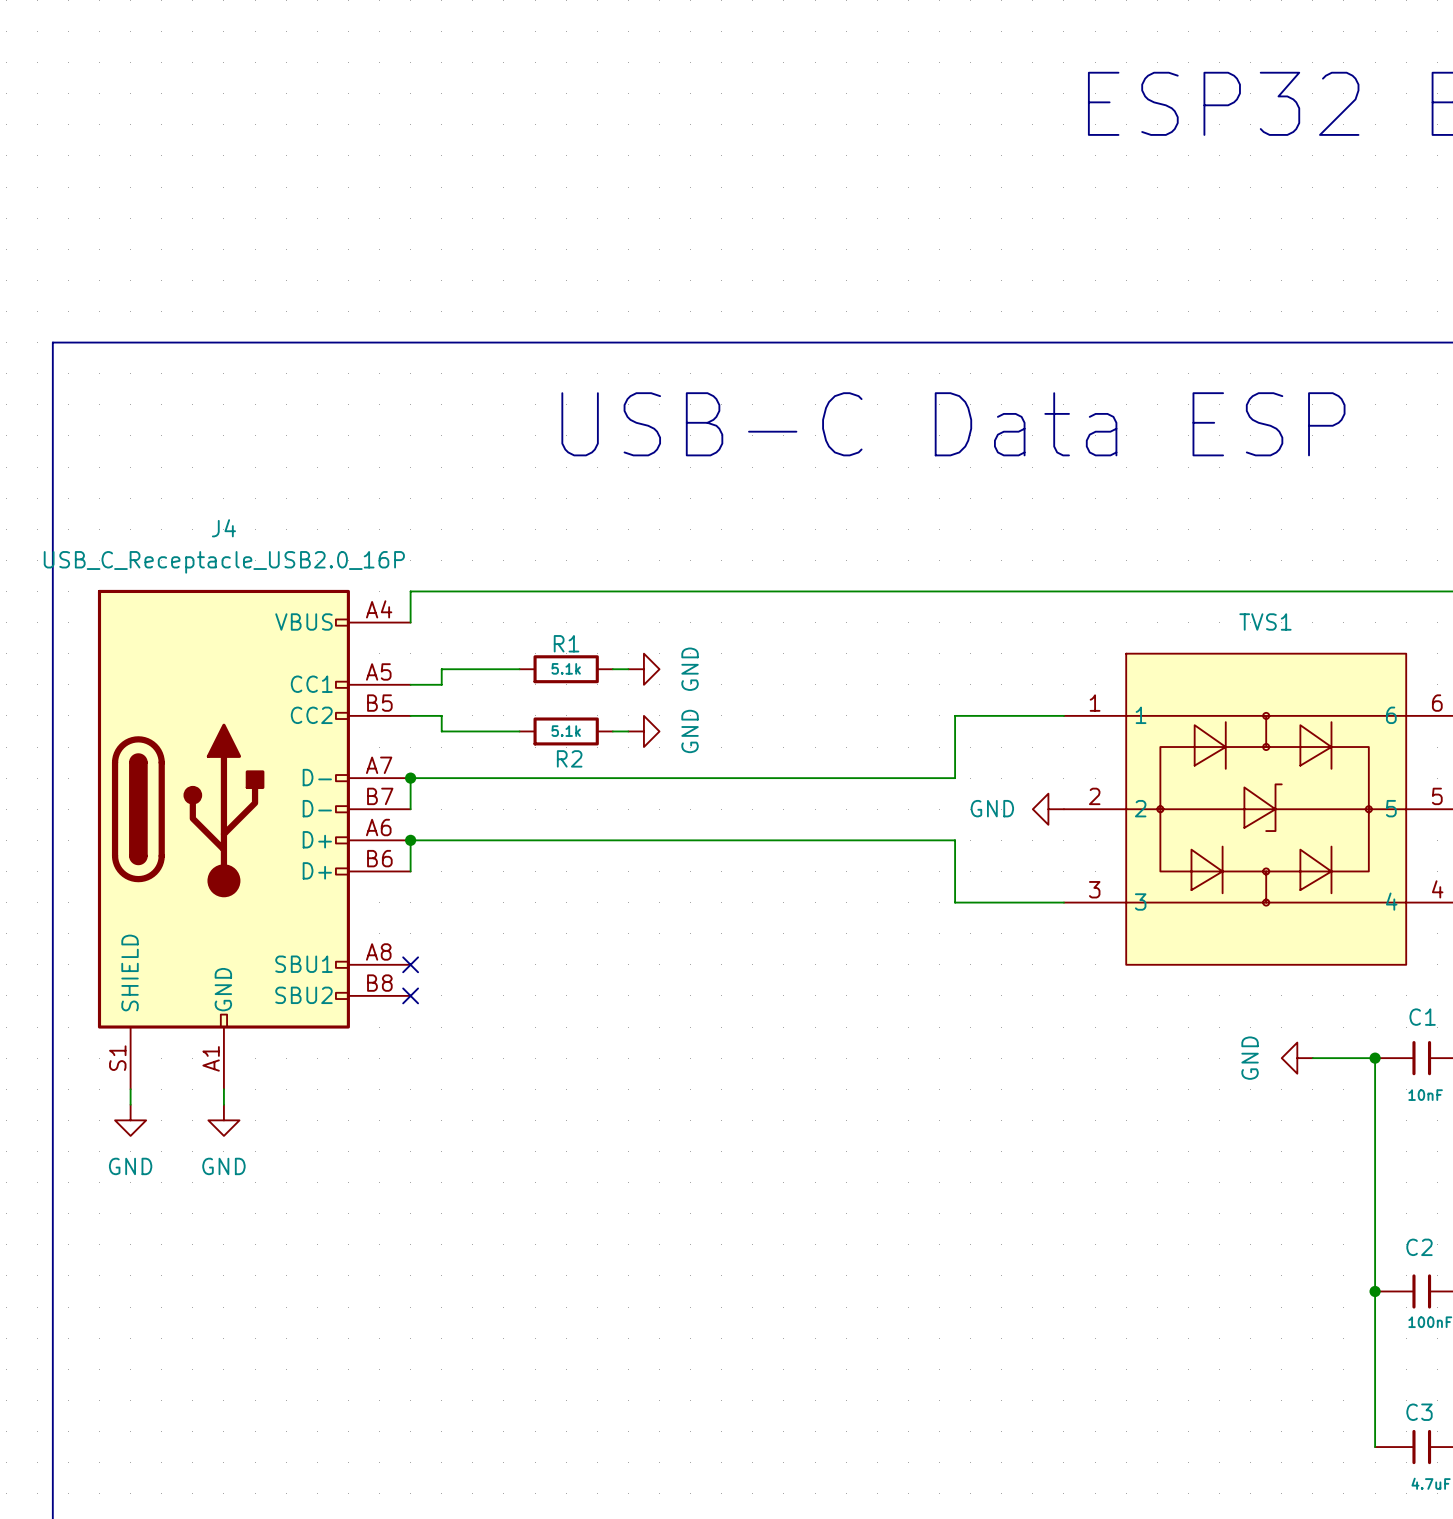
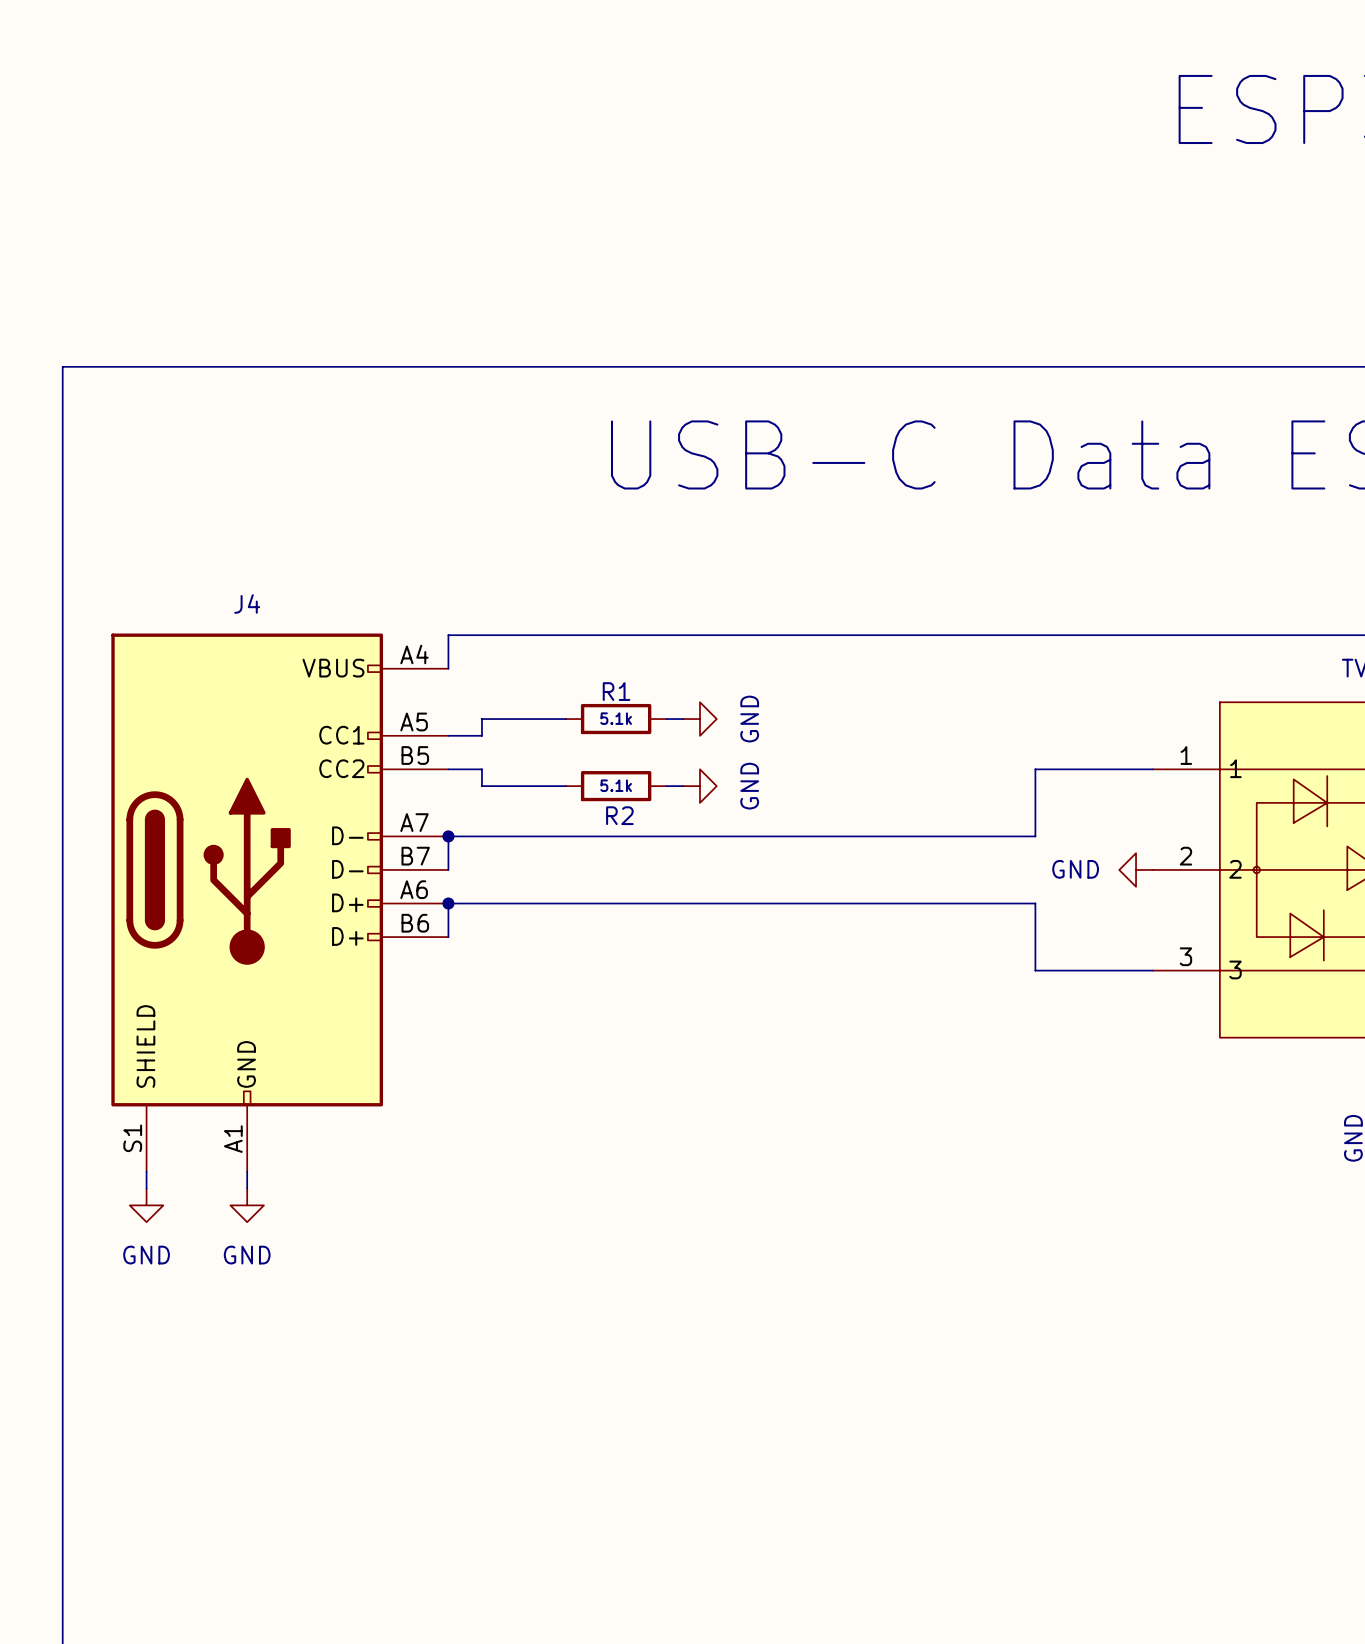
J4 name position: J4 (223, 528) -> J4 (247, 603)
J4 value: USB_C_Receptacle_USB2.0_16P (224, 562) -> none
J4 symbol: [97, 589, 411, 1090] -> [111, 633, 449, 1172]
no-connect mark: (410, 964) -> none
no-connect mark: (410, 995) -> none

